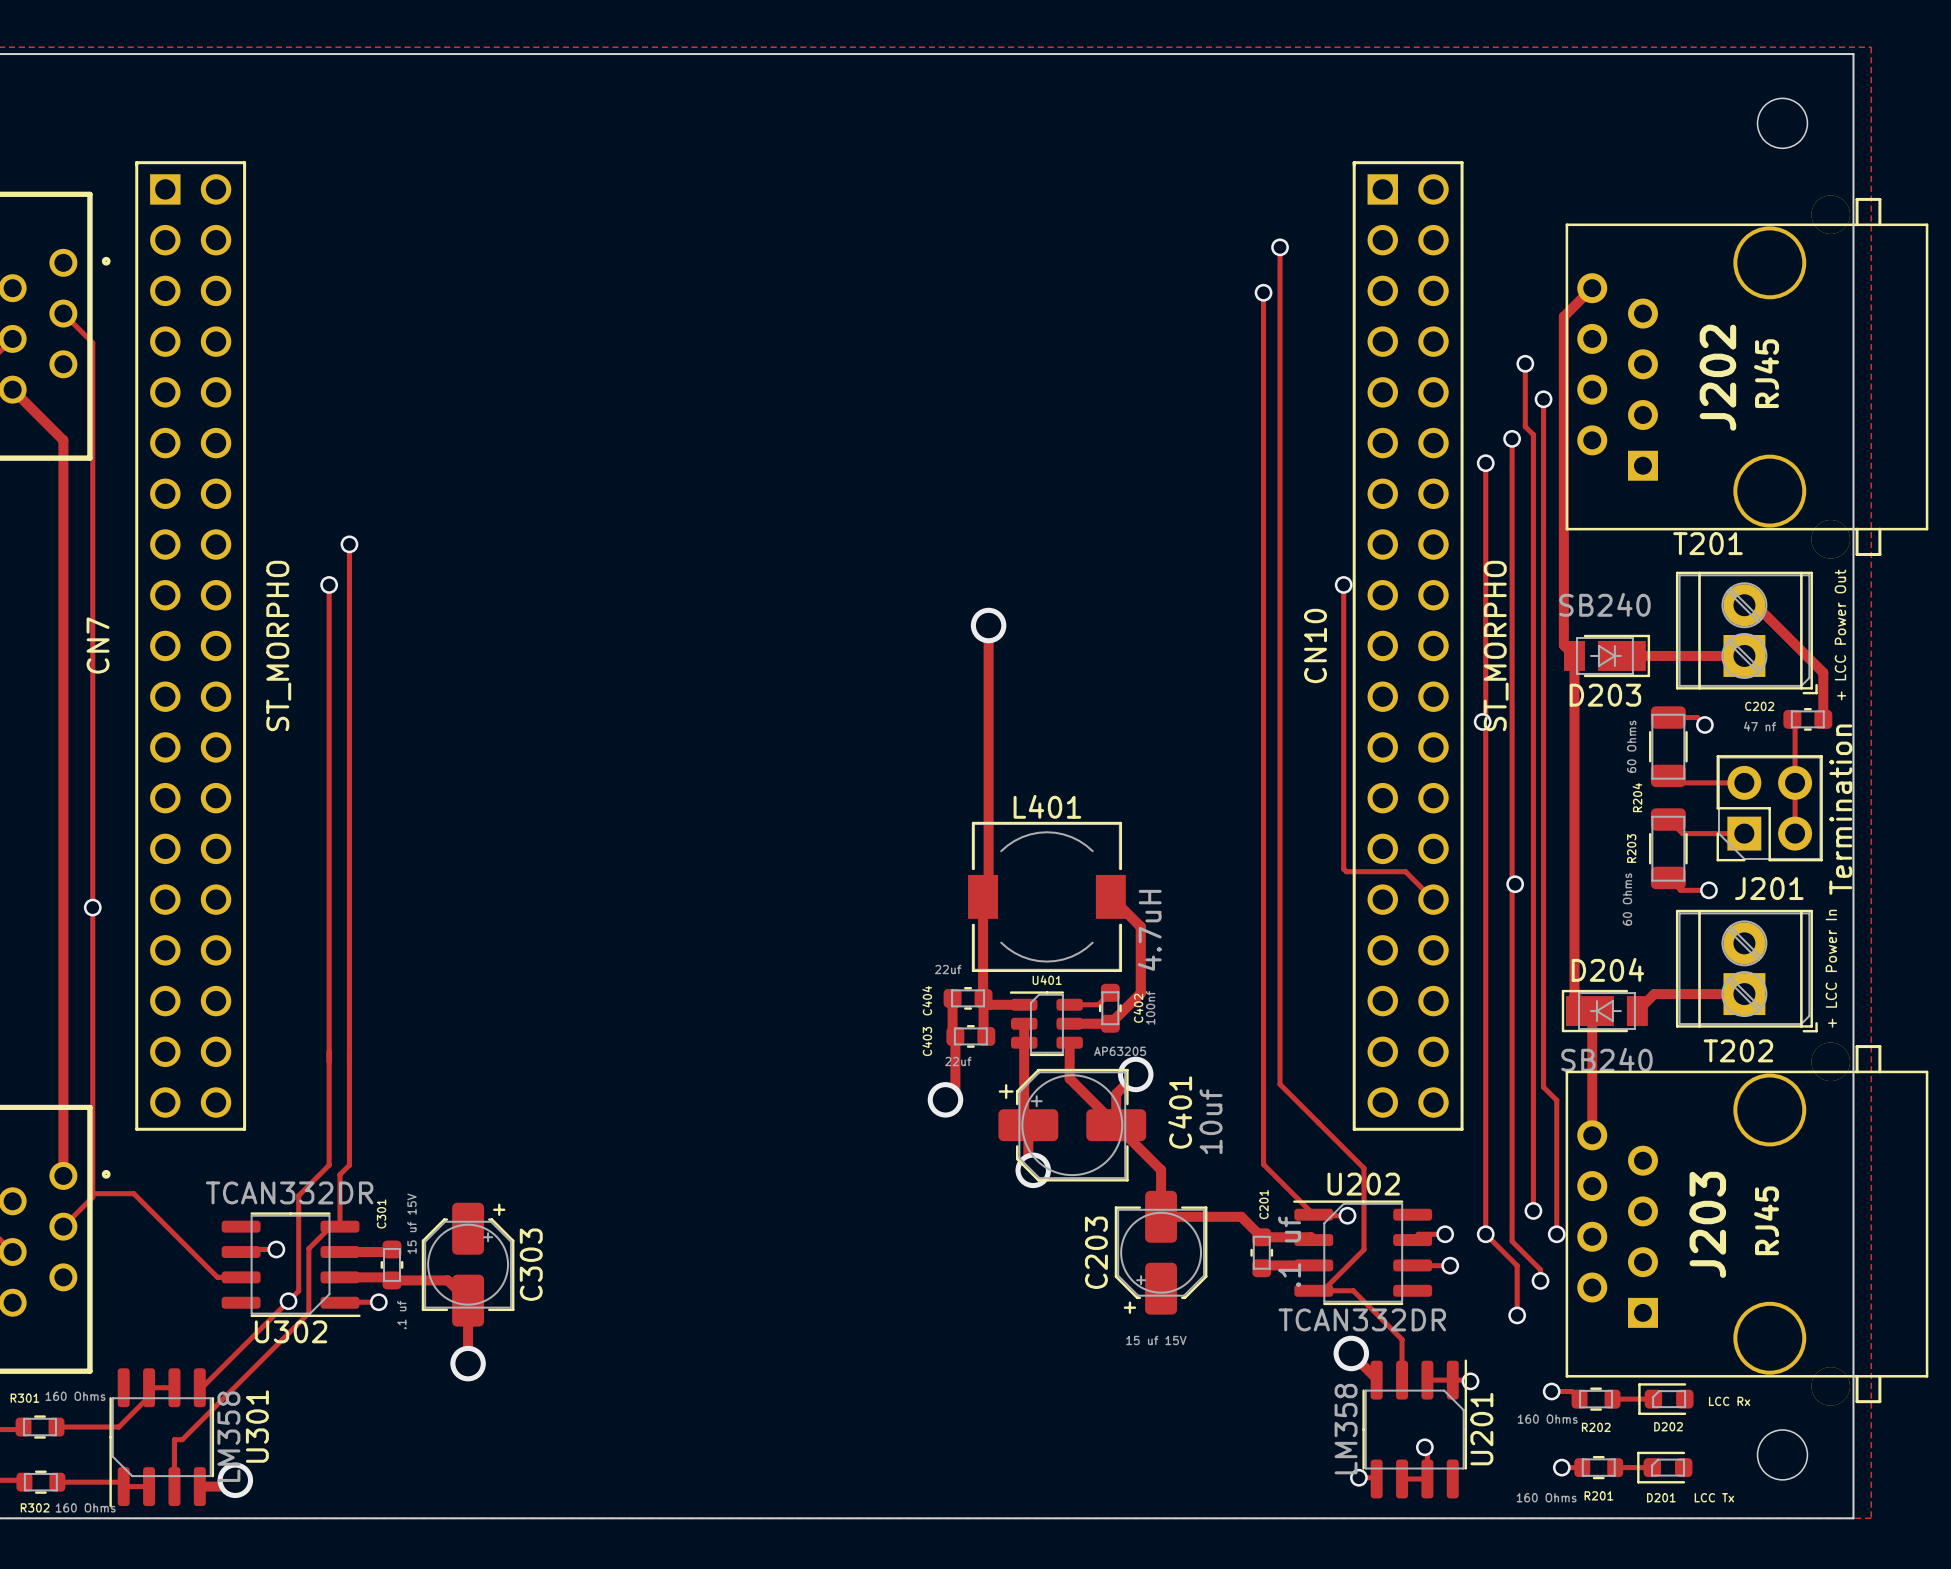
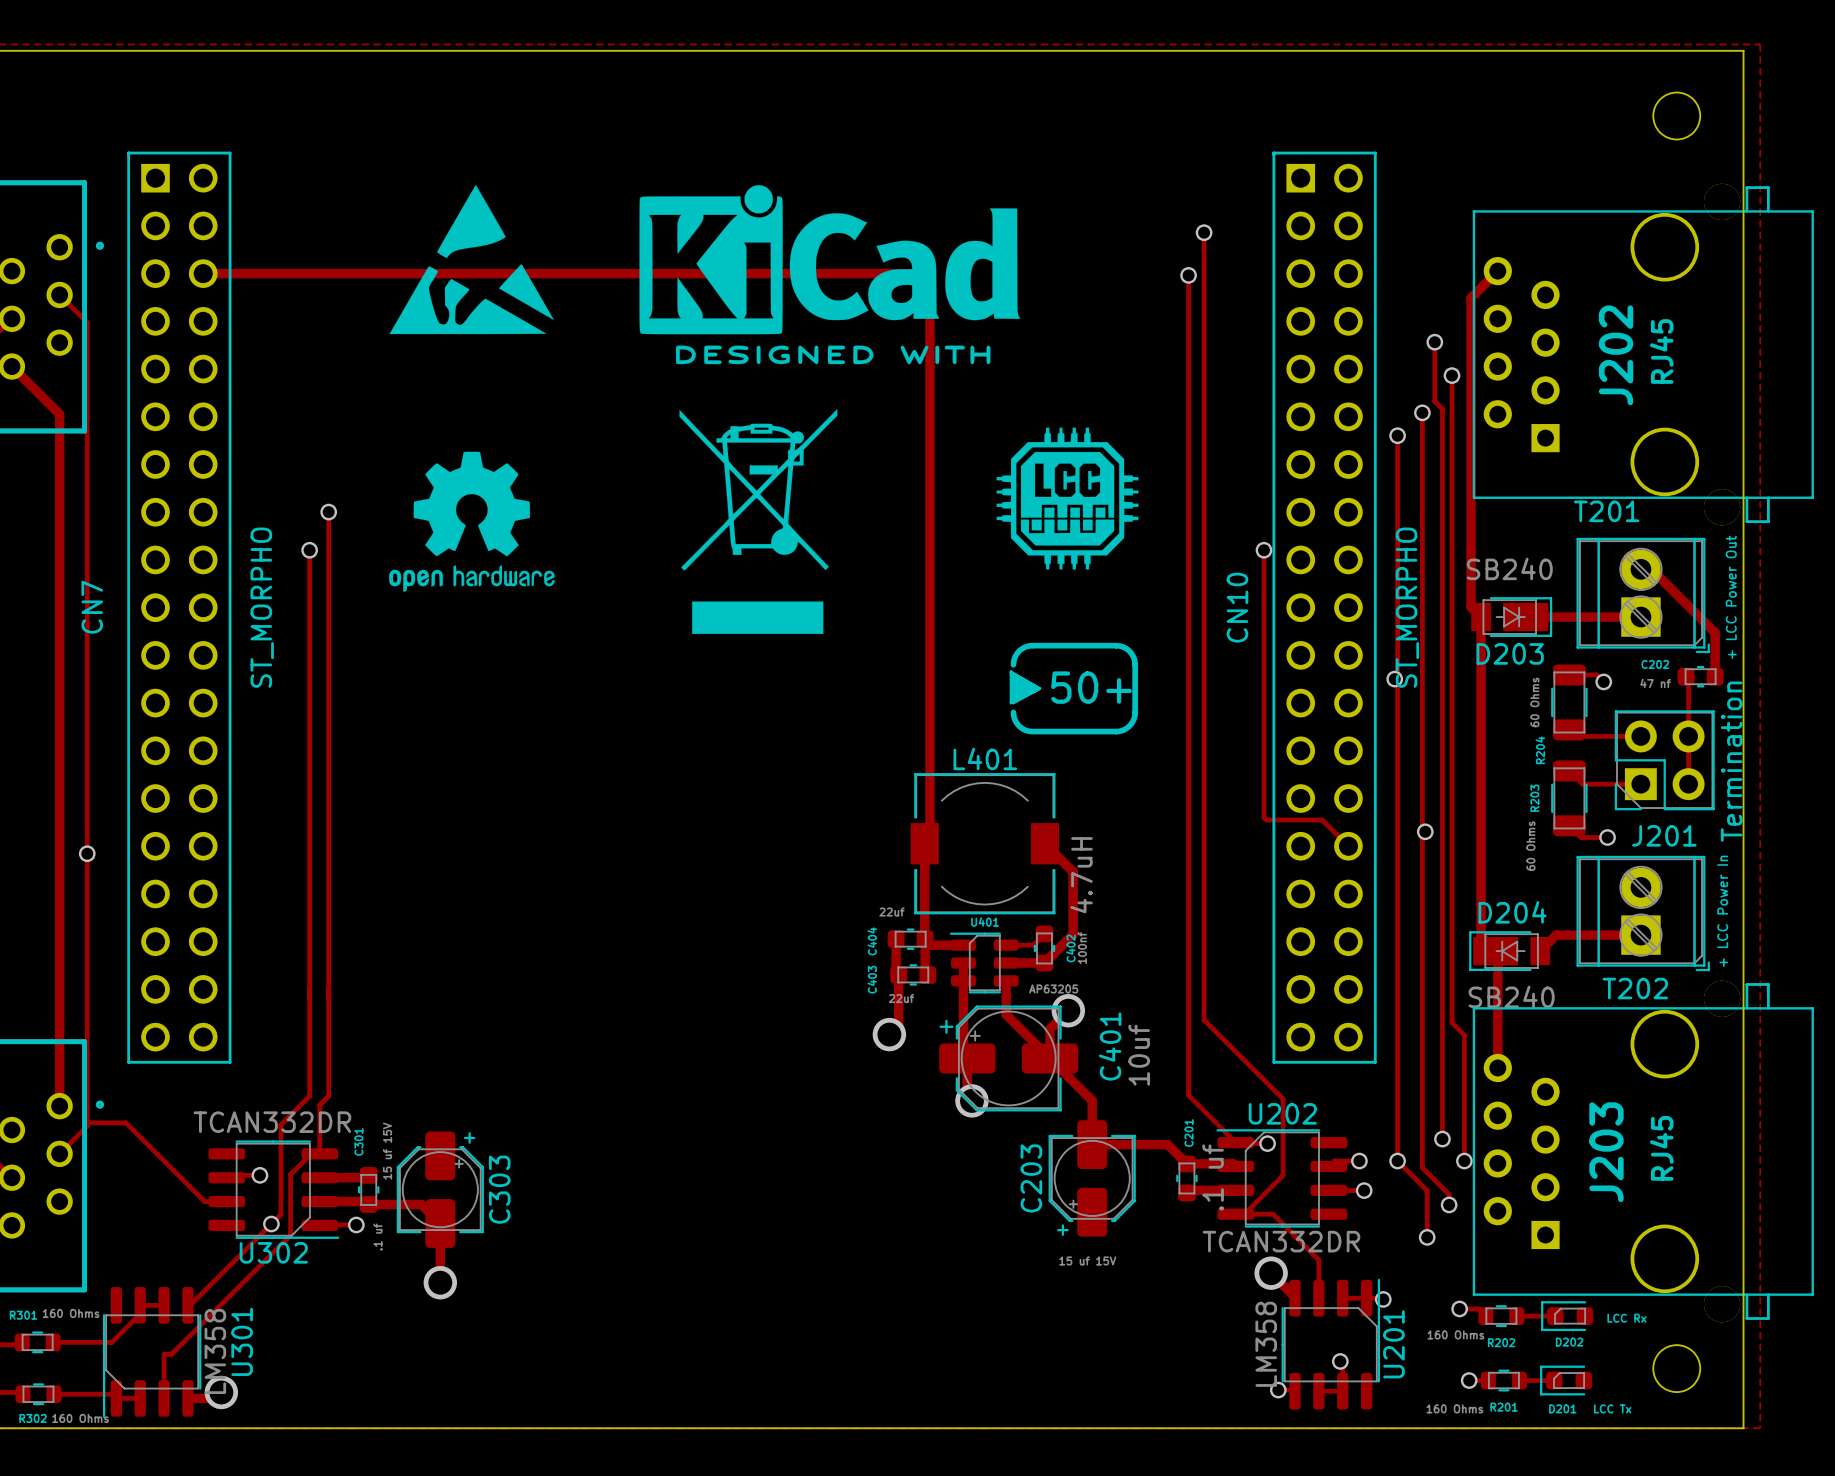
drawing: none -> [389, 185, 554, 335]
drawing: none -> [639, 185, 1021, 365]
track: none -> (203, 273) (920, 273) (929, 283) (929, 588)
drawing: none -> [679, 409, 838, 634]
drawing: none -> [996, 427, 1139, 570]
drawing: none -> [389, 451, 555, 592]
via: (988, 625) -> none
drawing: none -> [1009, 642, 1138, 735]

